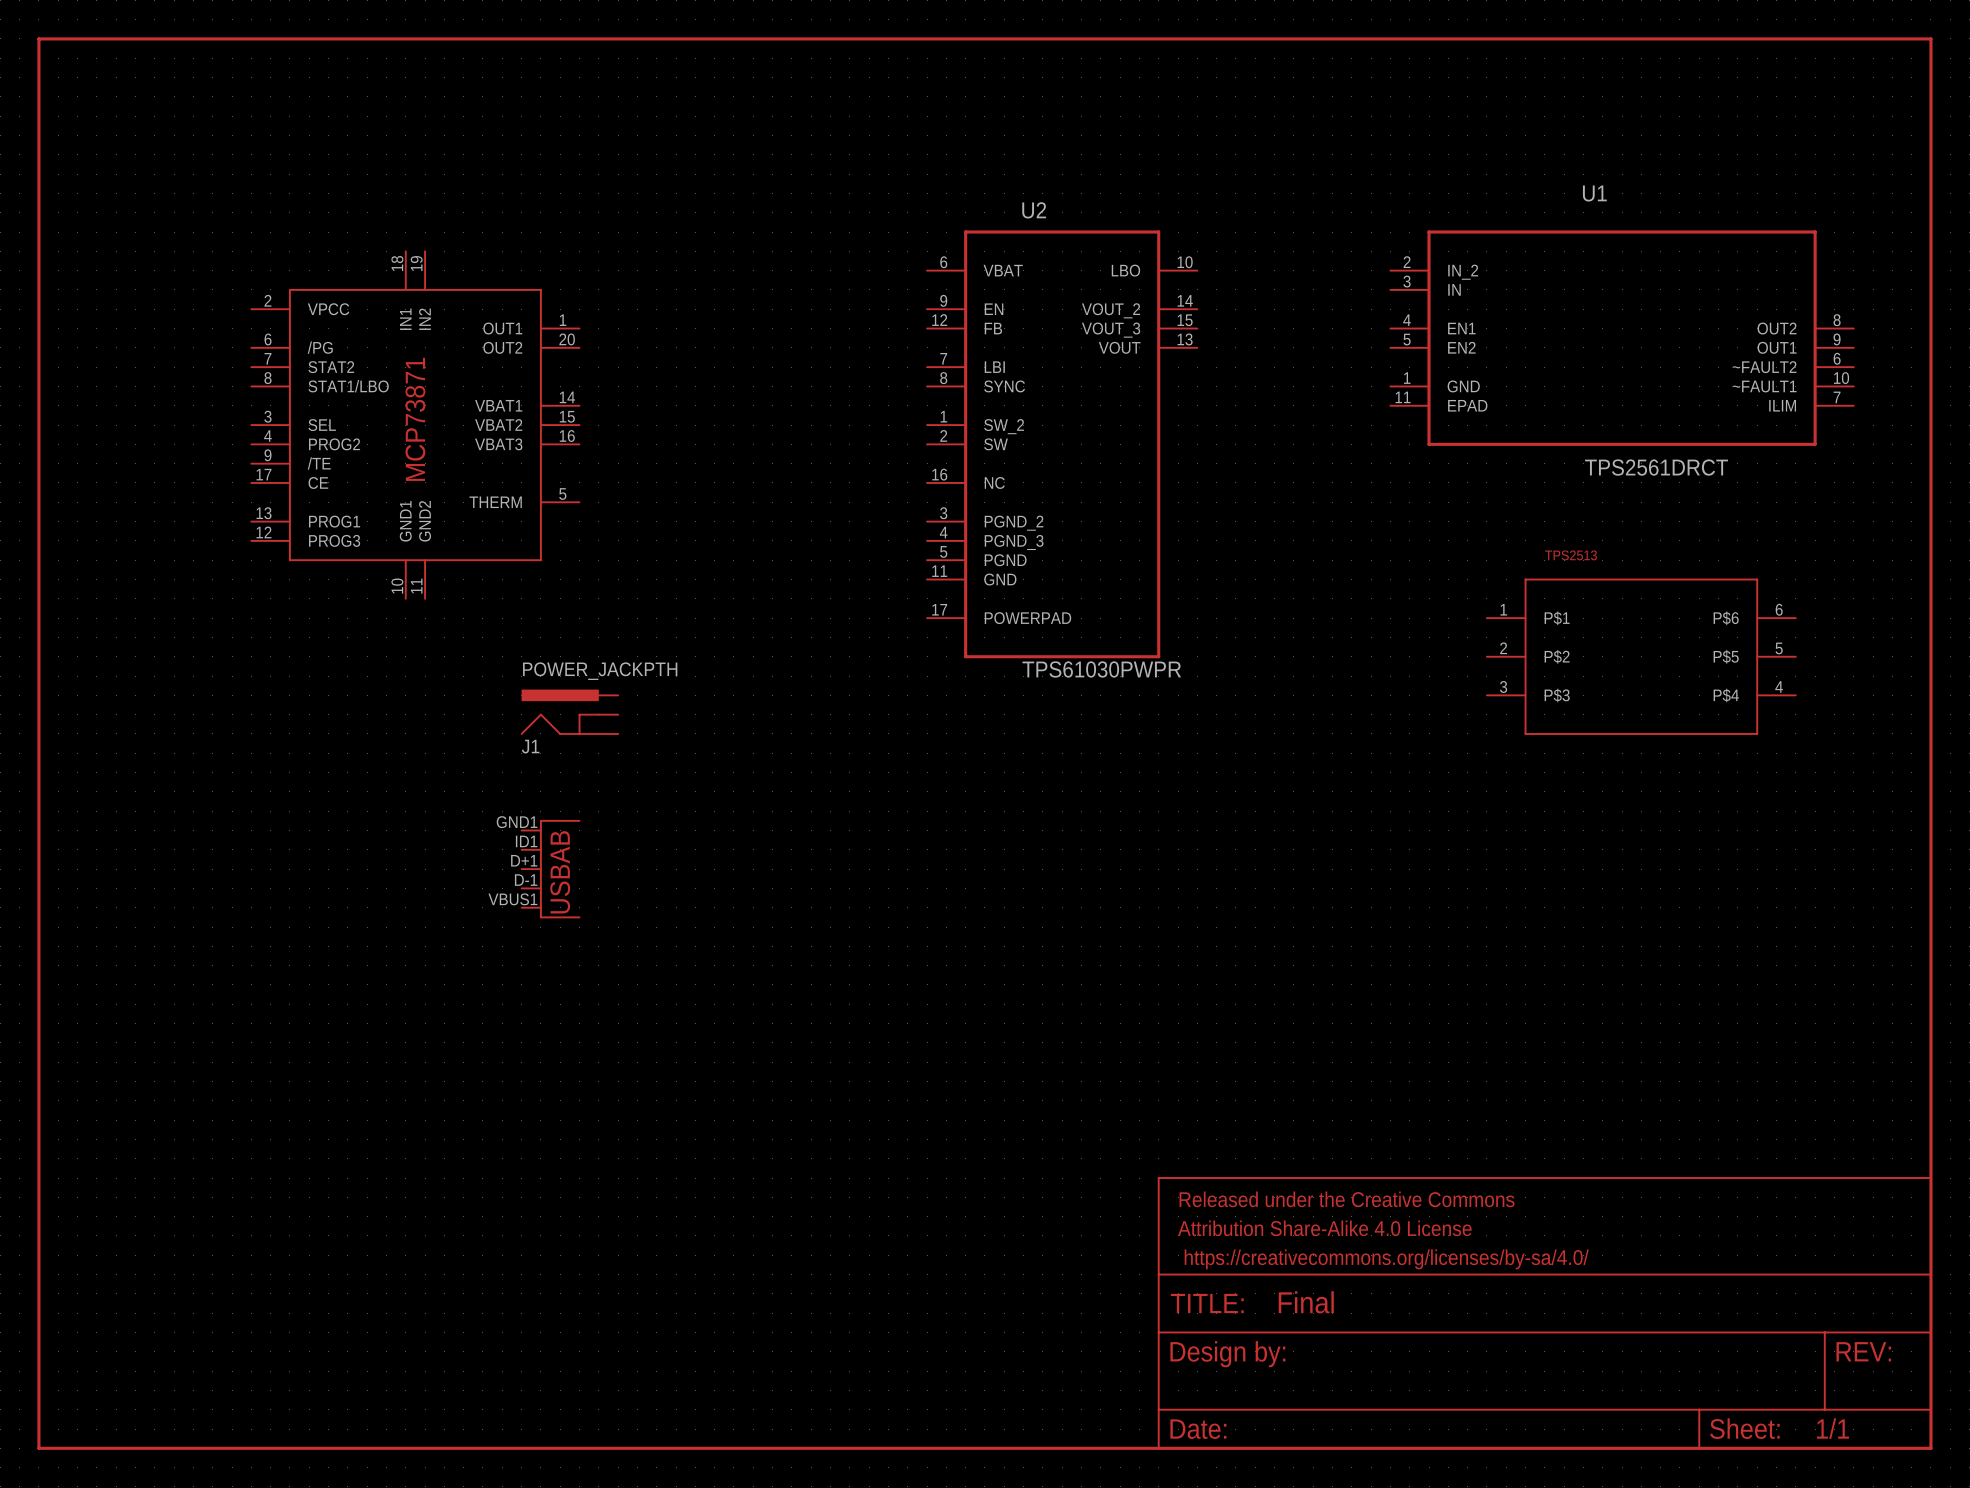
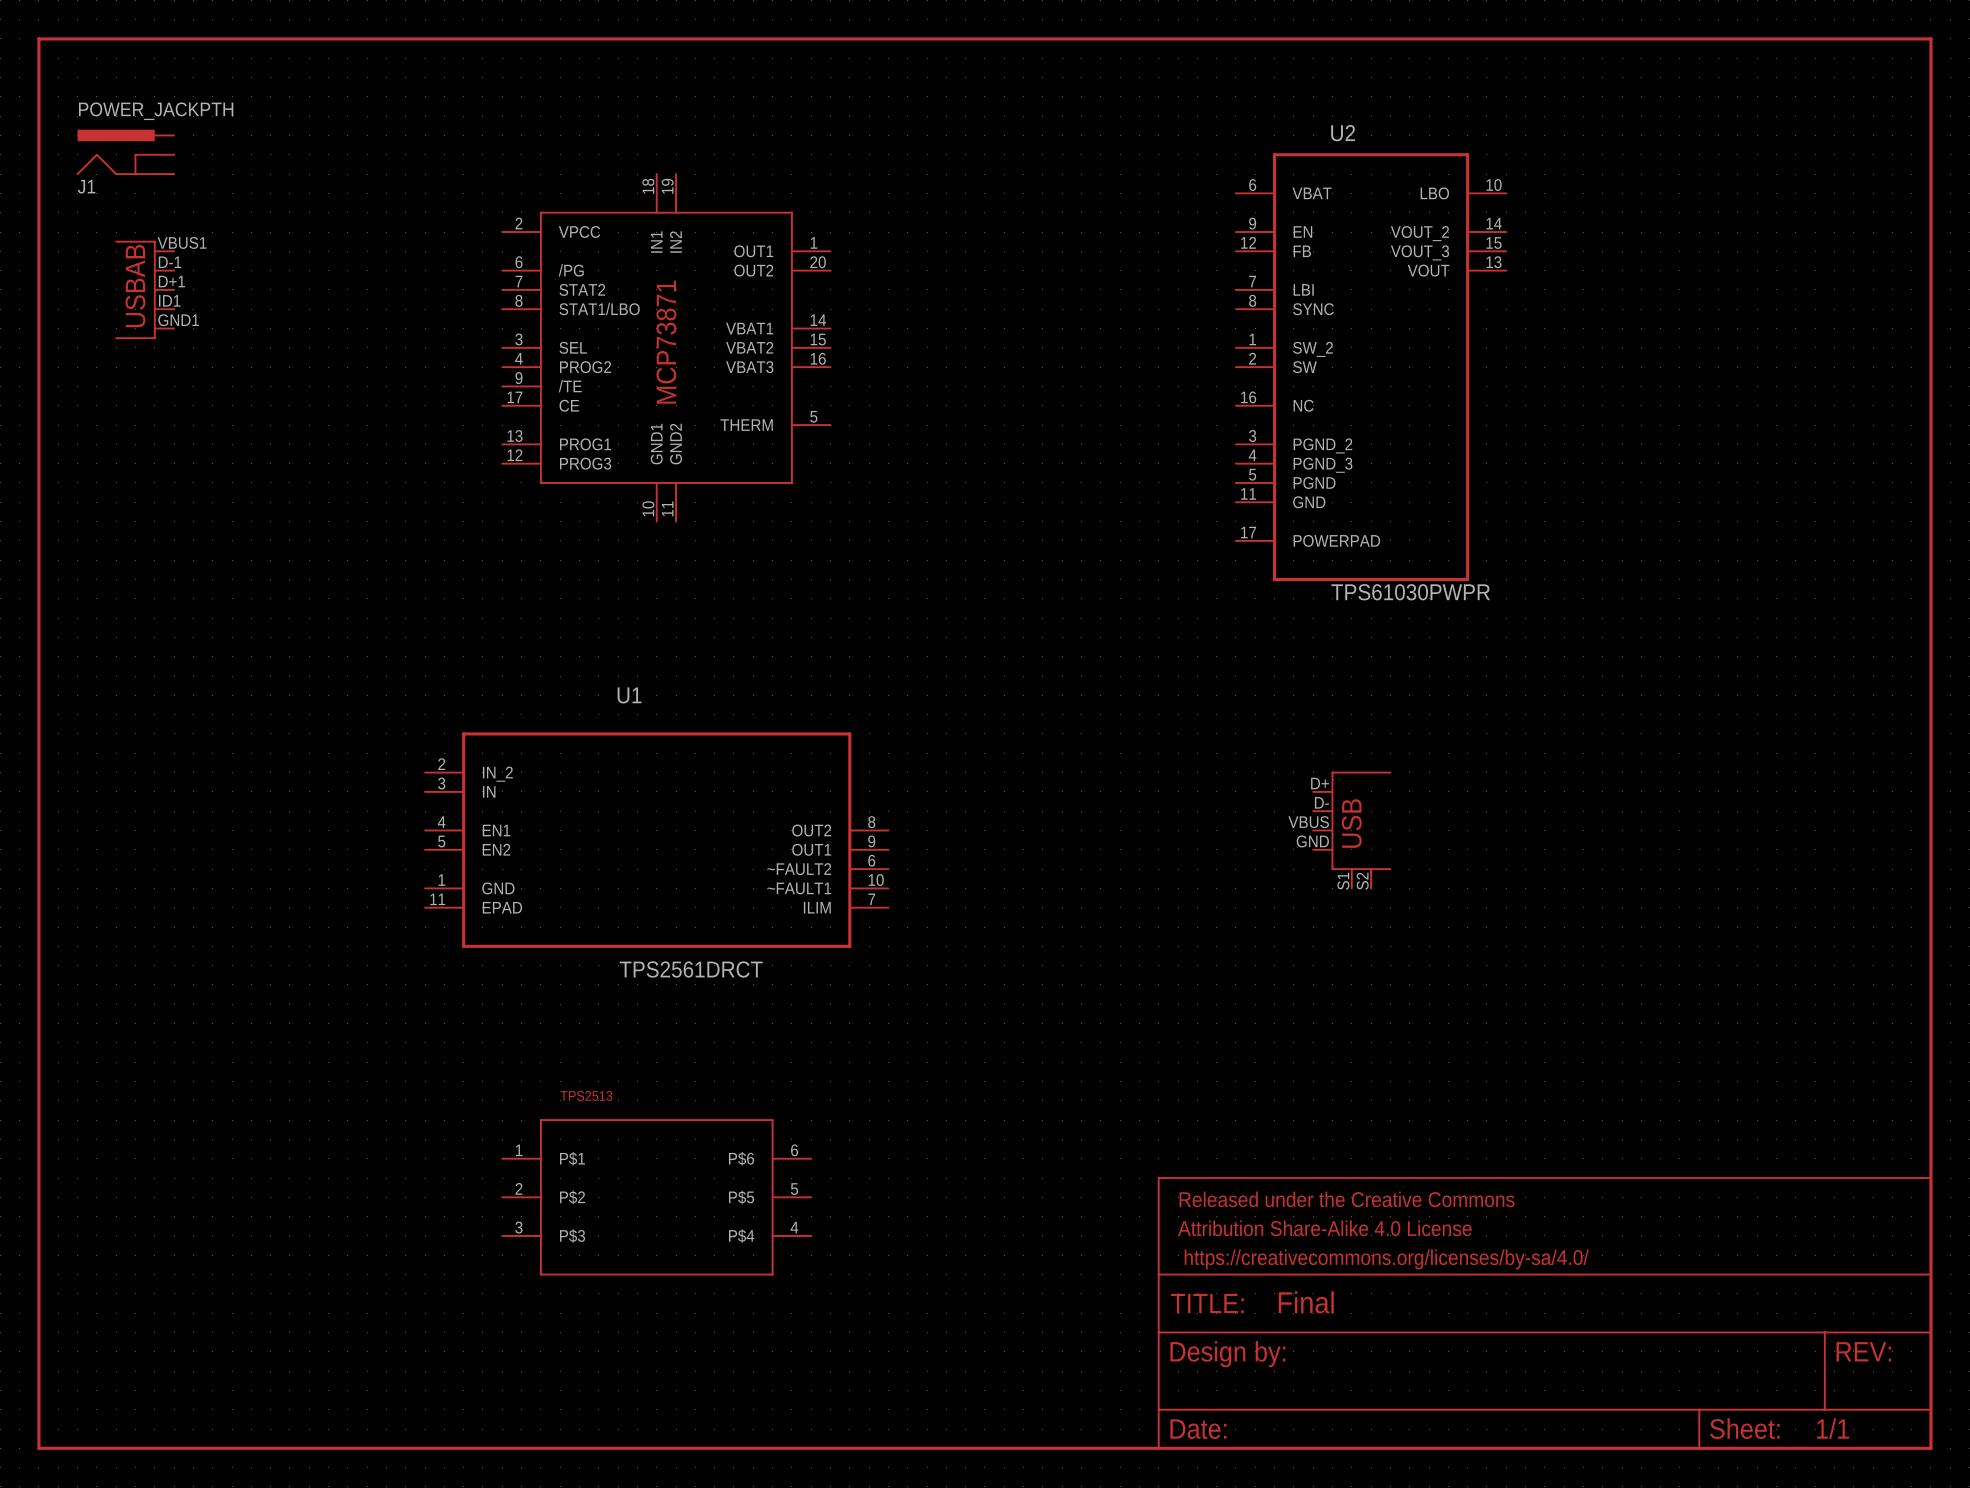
part: none -> (144, 289)
U1 position: (1622, 338) -> (656, 840)
part: none -> (666, 347)
part: (415, 425) -> none
U2 position: (1062, 444) -> (1371, 367)
TPS2513 position: (1641, 656) -> (656, 1197)
J1 position: (569, 712) -> (125, 152)
part: none -> (1352, 830)
part: (551, 869) -> none

